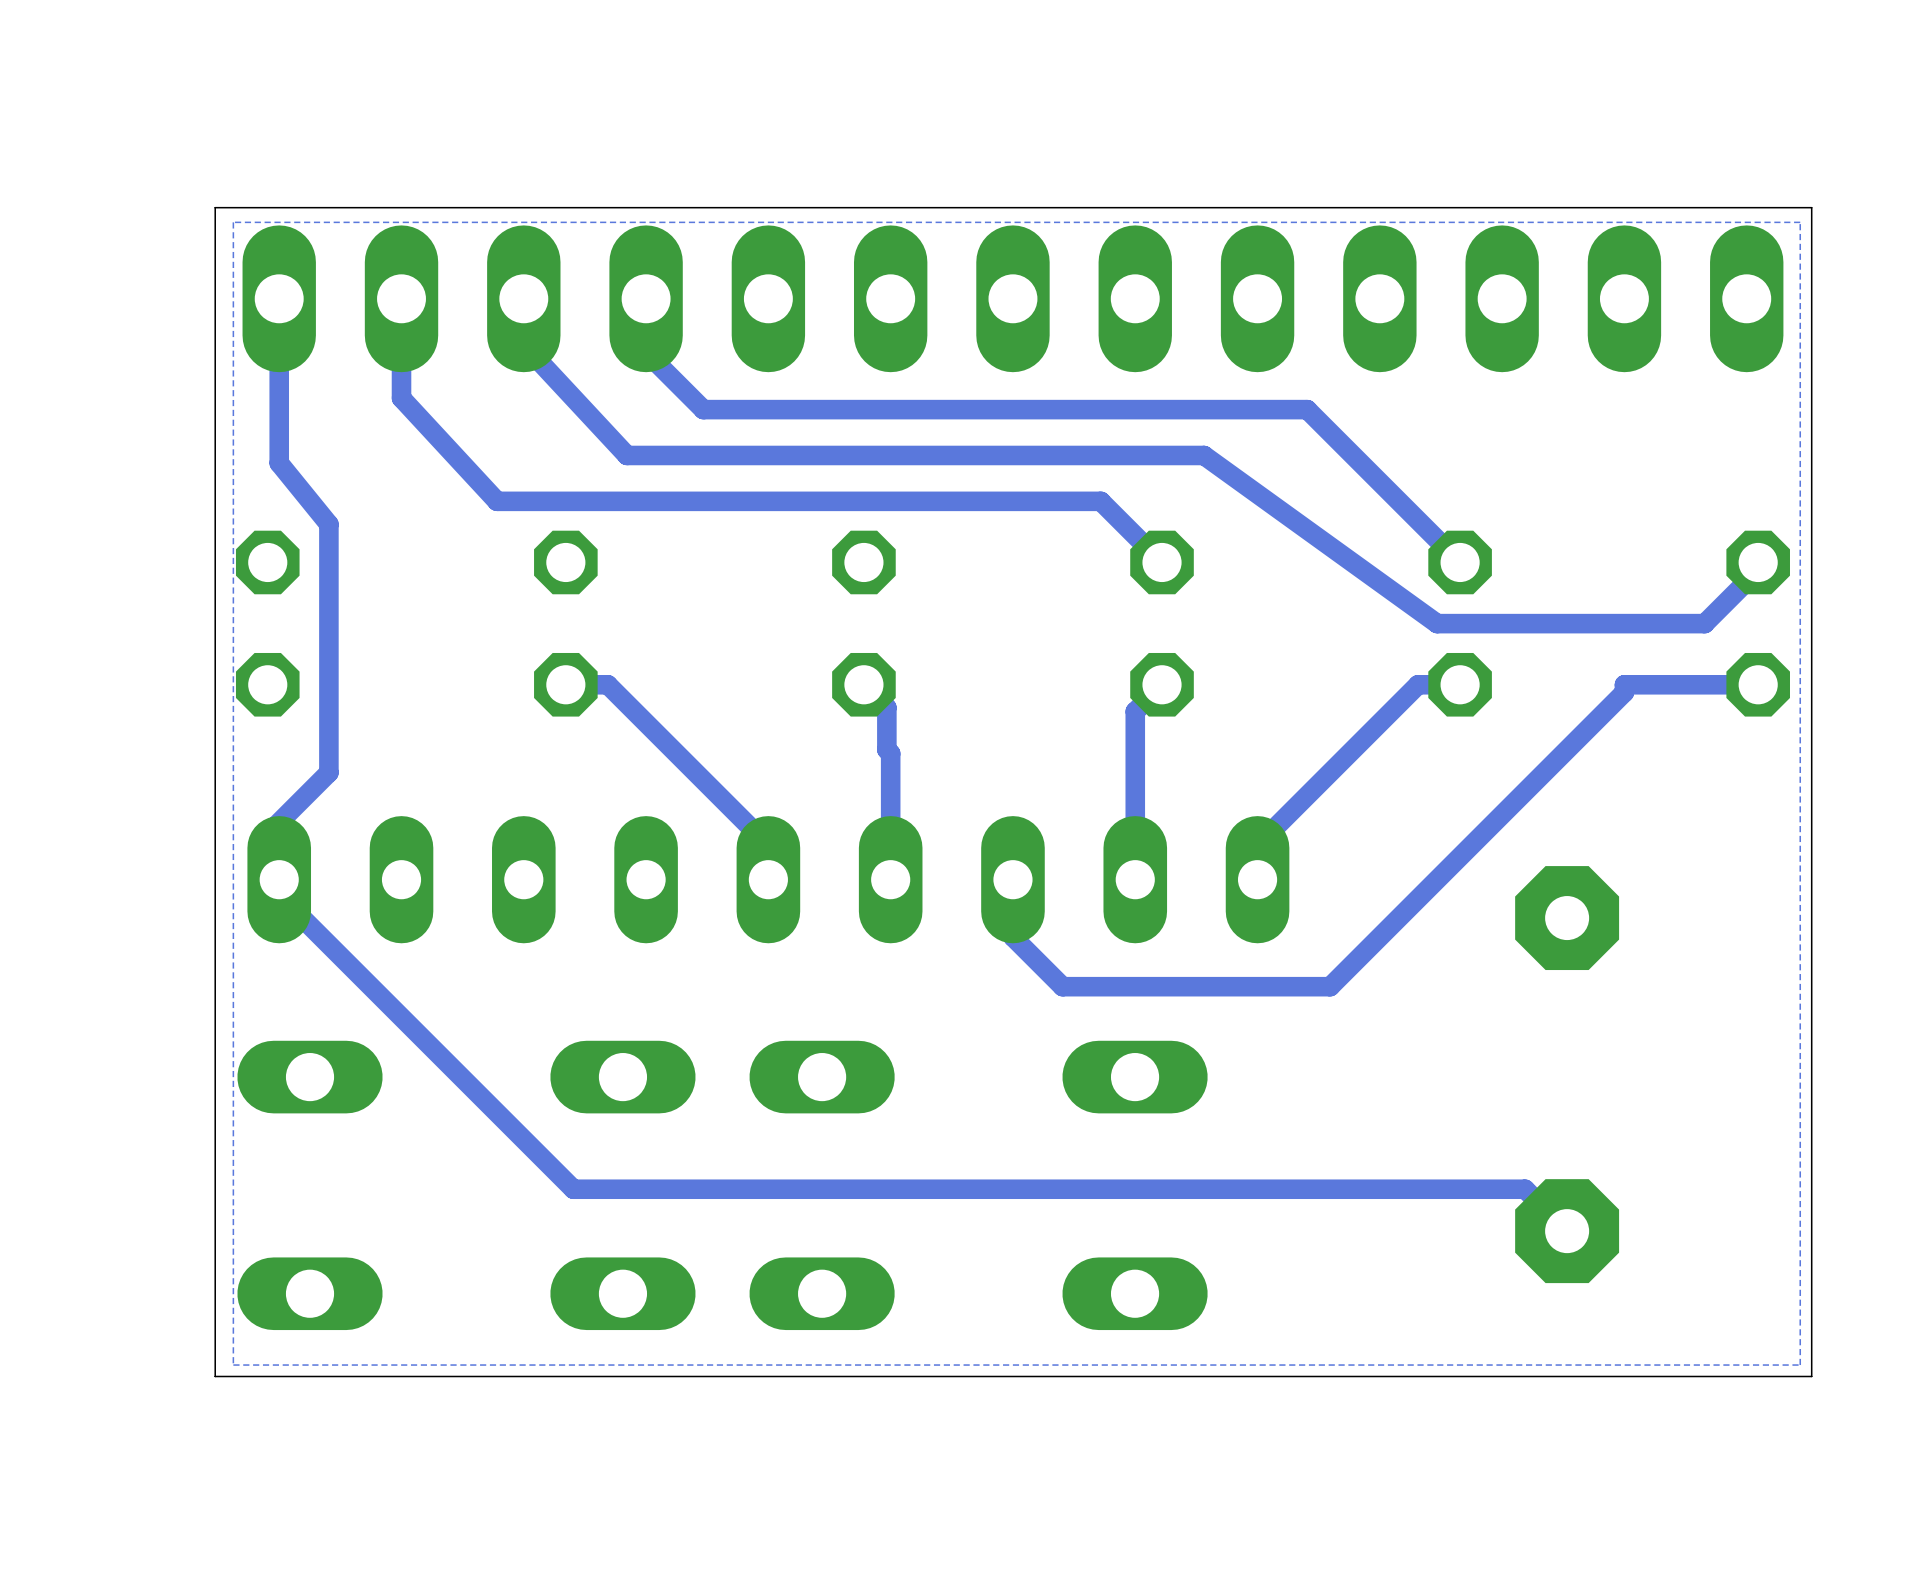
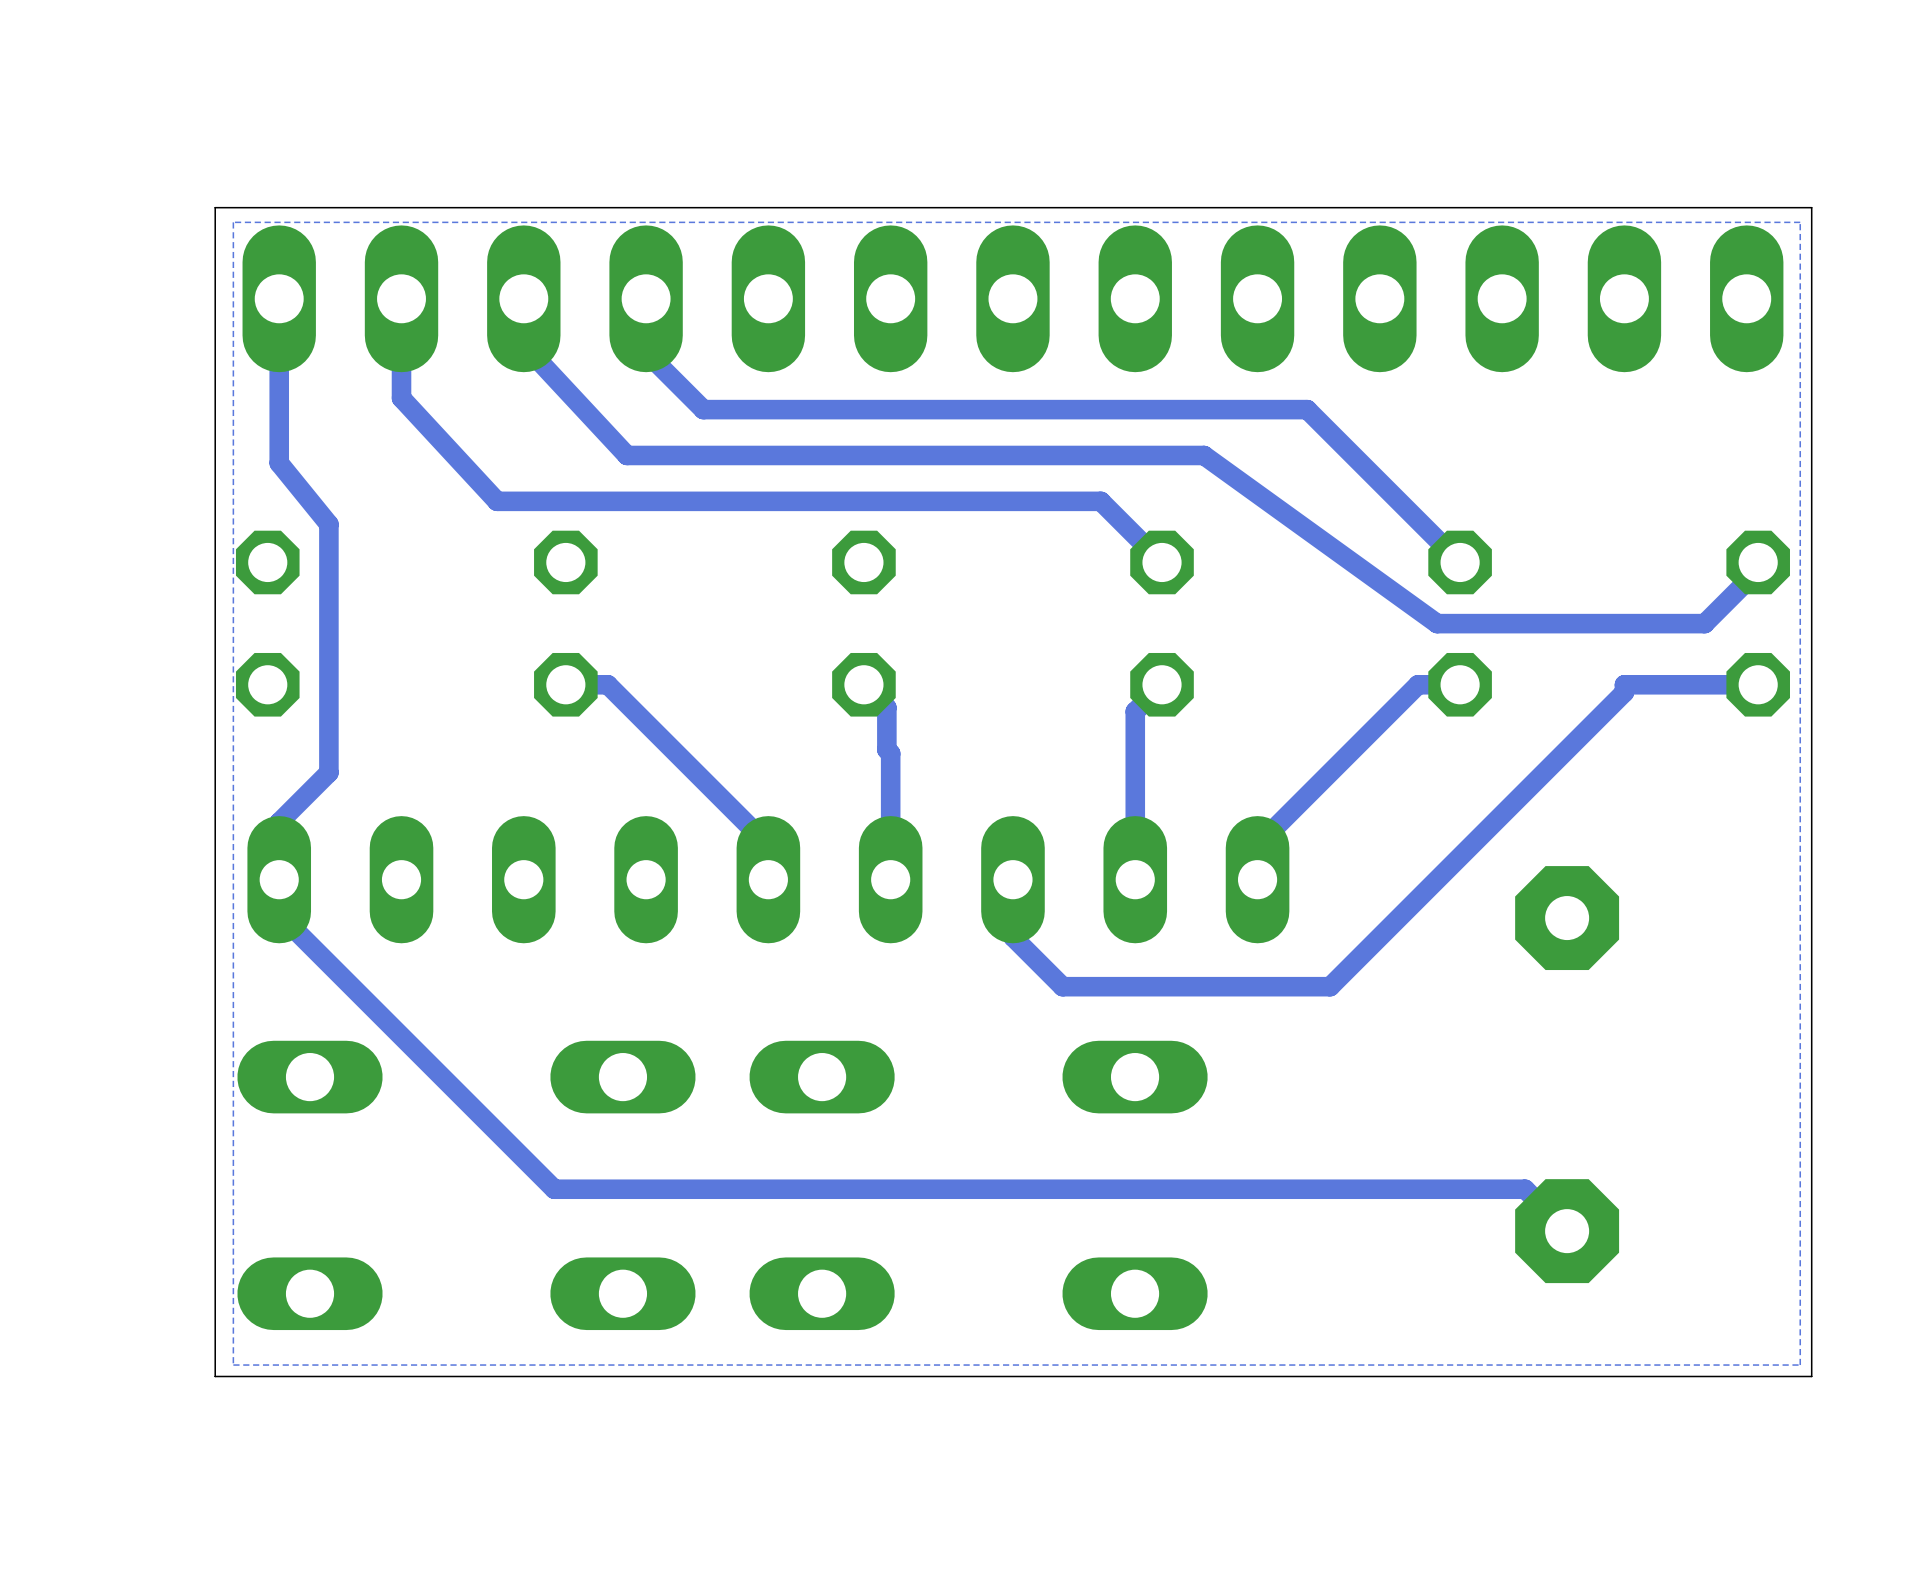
track: (279, 822) (275, 826) (275, 891) (573, 1189) -> (279, 822) (279, 914) (554, 1189) (573, 1189)

